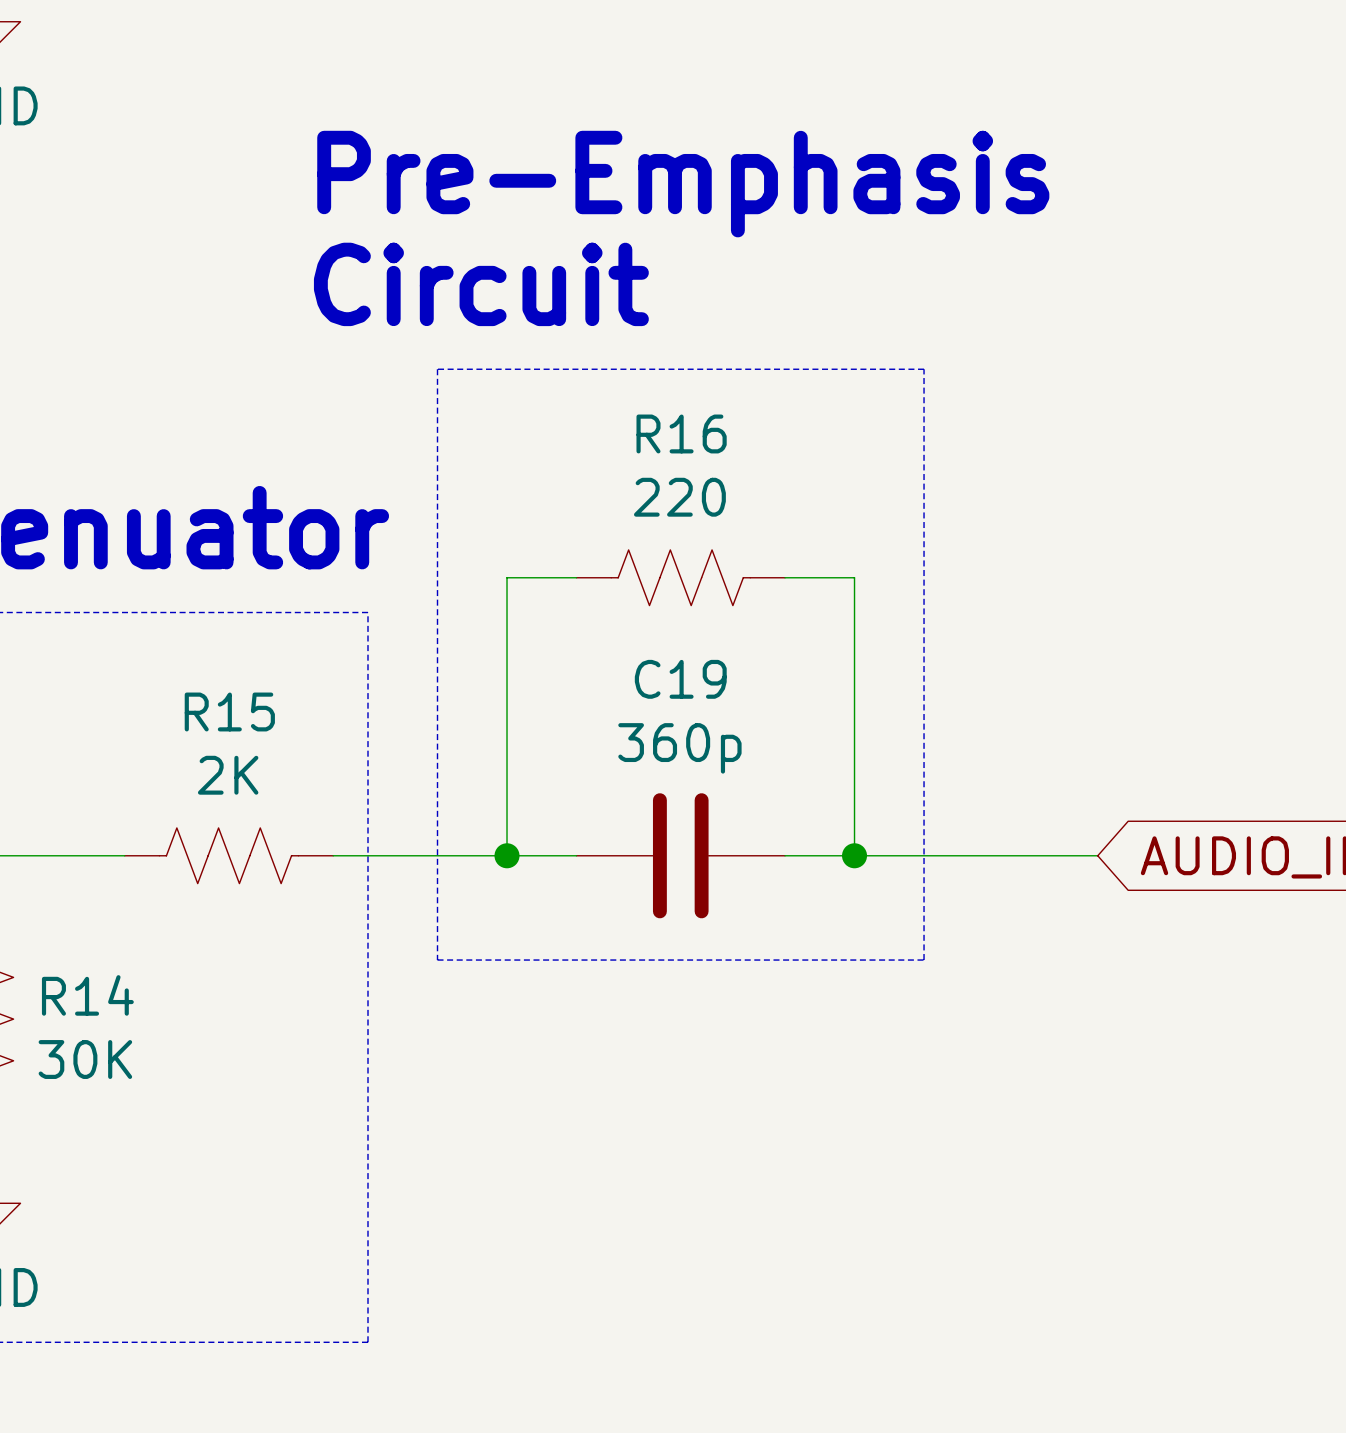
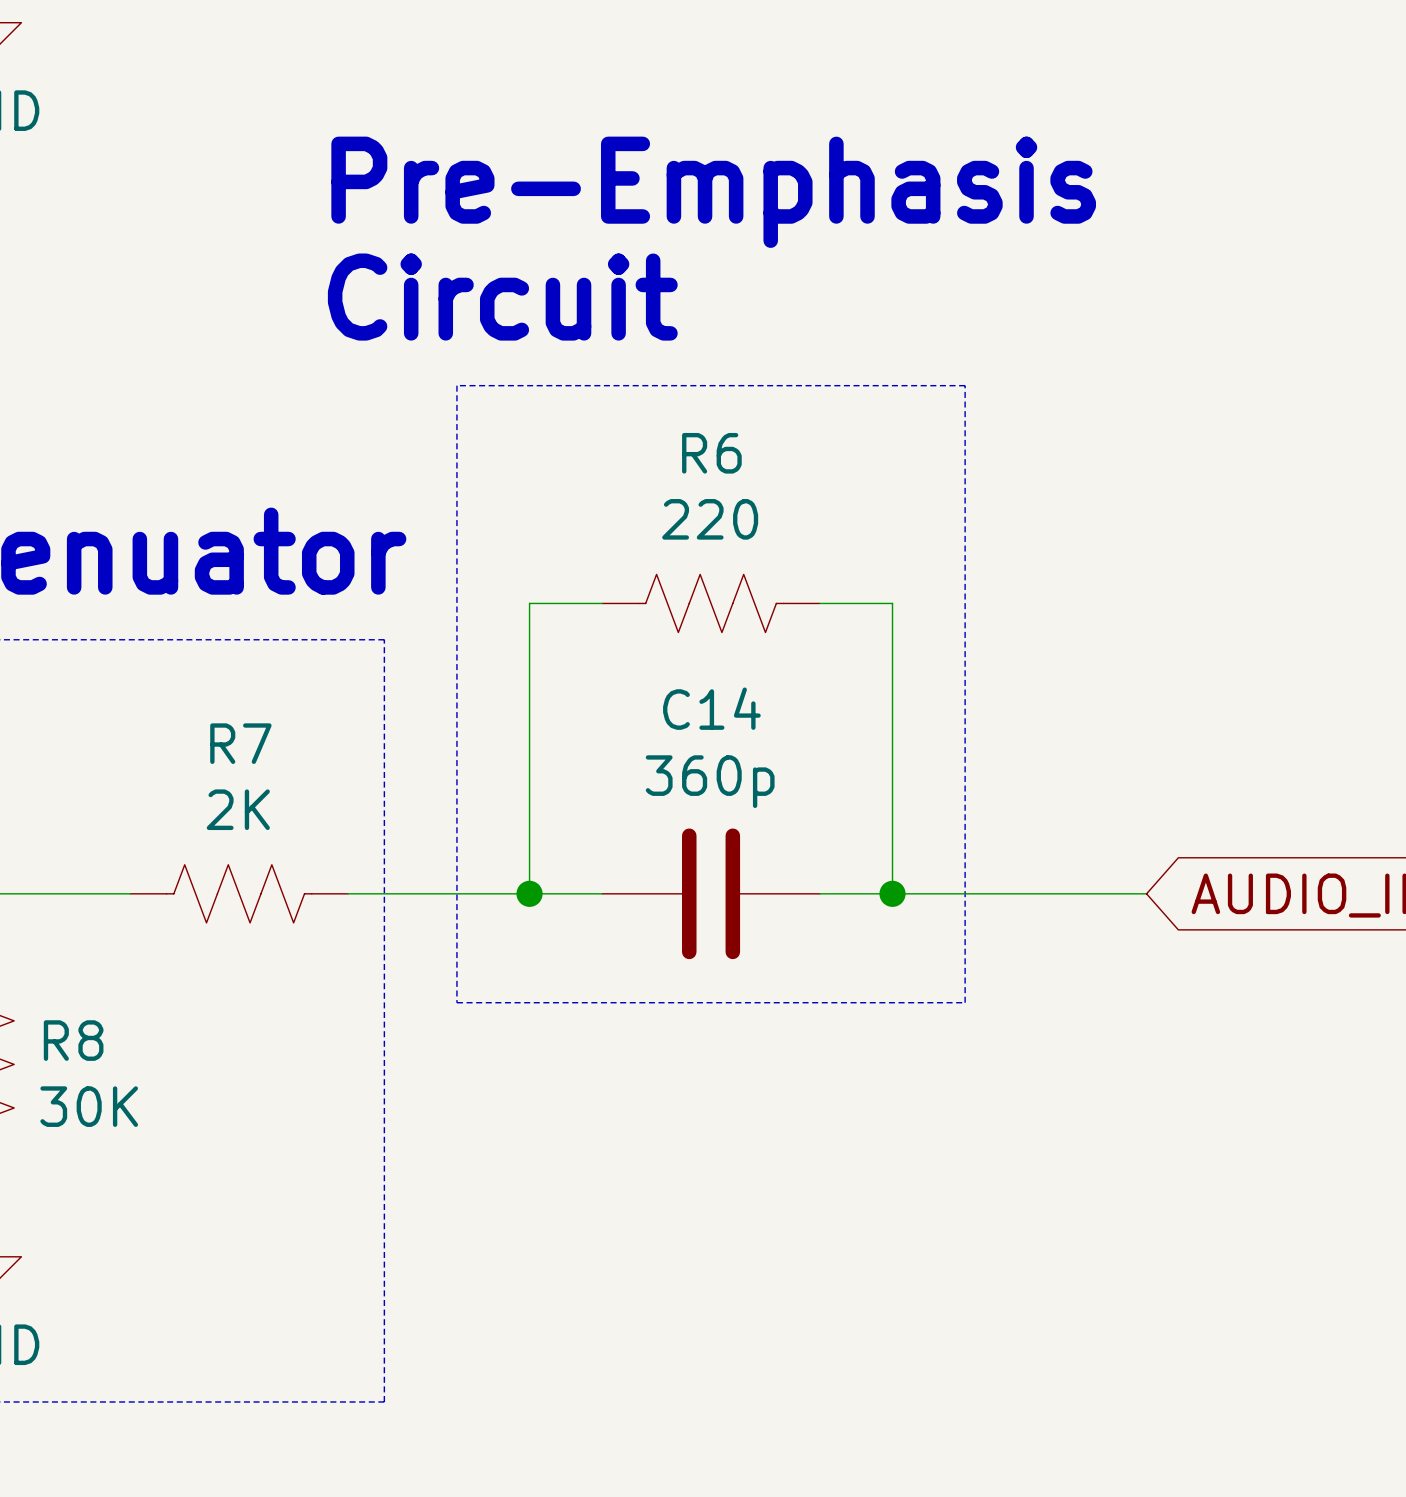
R16 name: R16 (681, 433) -> R6 (711, 453)
C19 name: C19 (680, 679) -> C14 (711, 708)
R15 name: R15 (229, 711) -> R7 (240, 743)
R14 name: R14 (87, 995) -> R8 (73, 1040)

